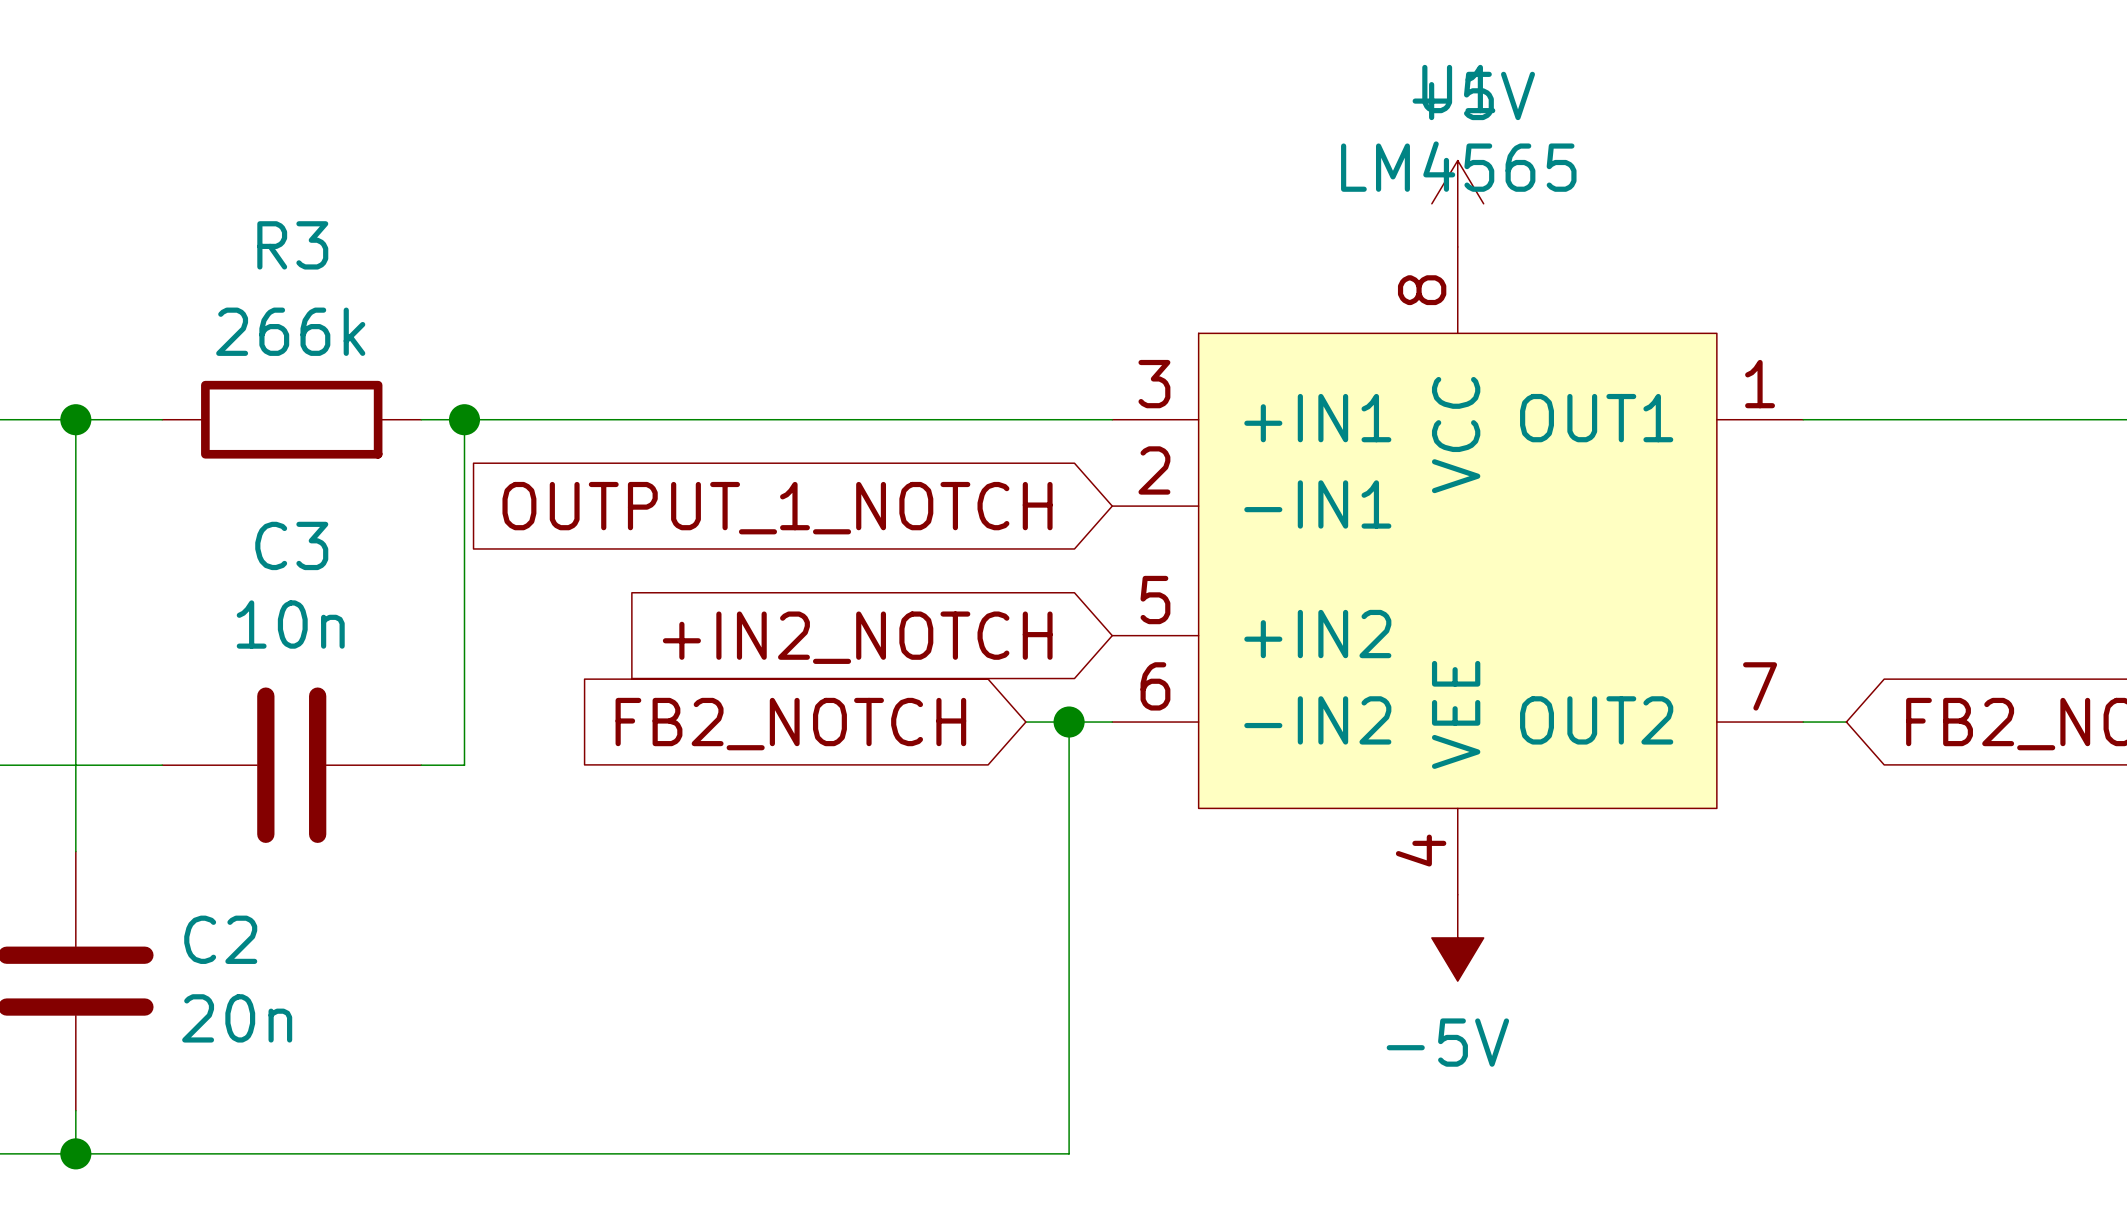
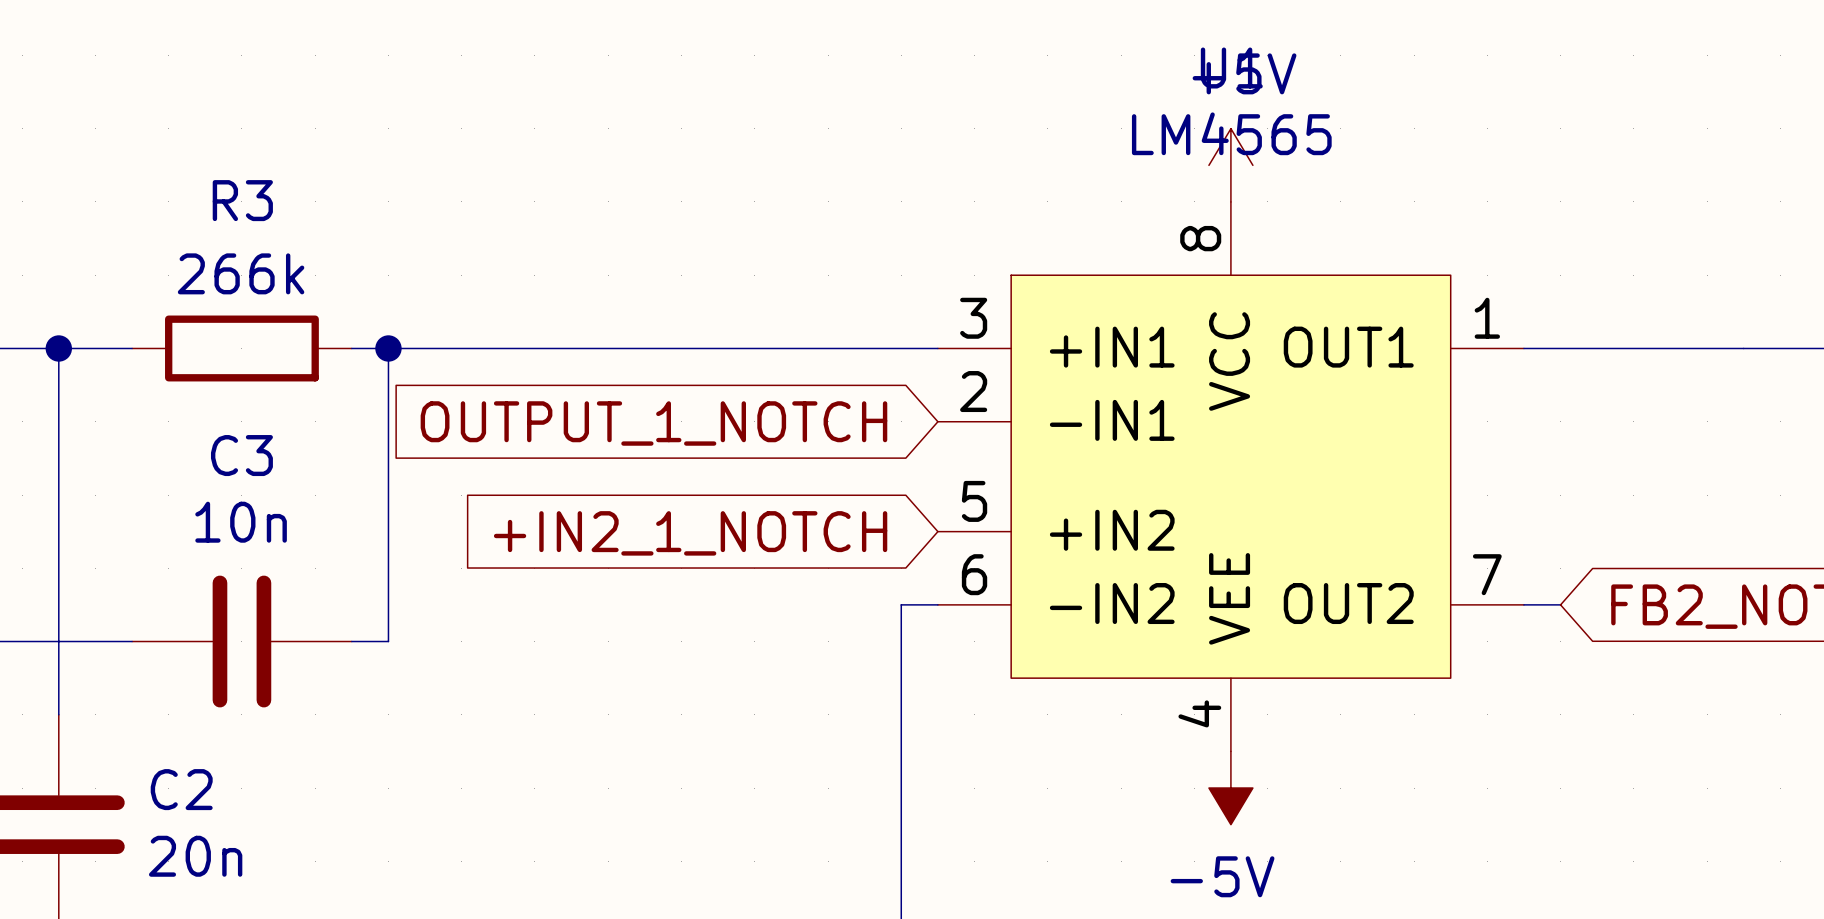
global label: +IN2_NOTCH (857, 637) -> +IN2_1_NOTCH (690, 533)
wire: (1025, 722) (1069, 722) -> none
junction: (1069, 722) -> none
global label: FB2_NOTCH (790, 724) -> none

